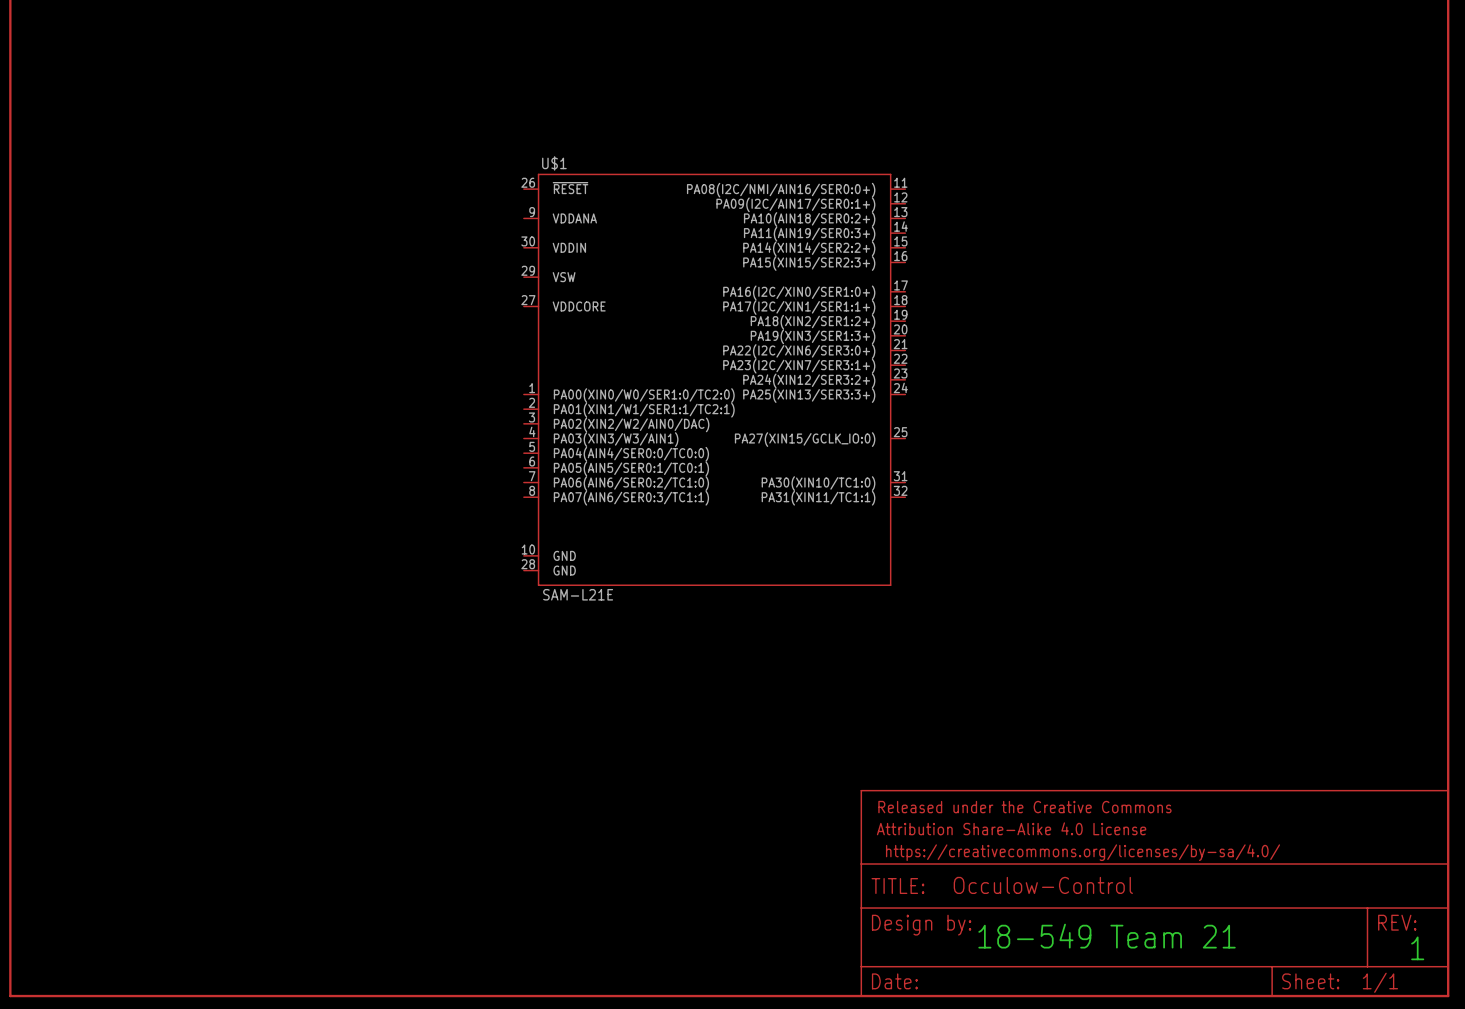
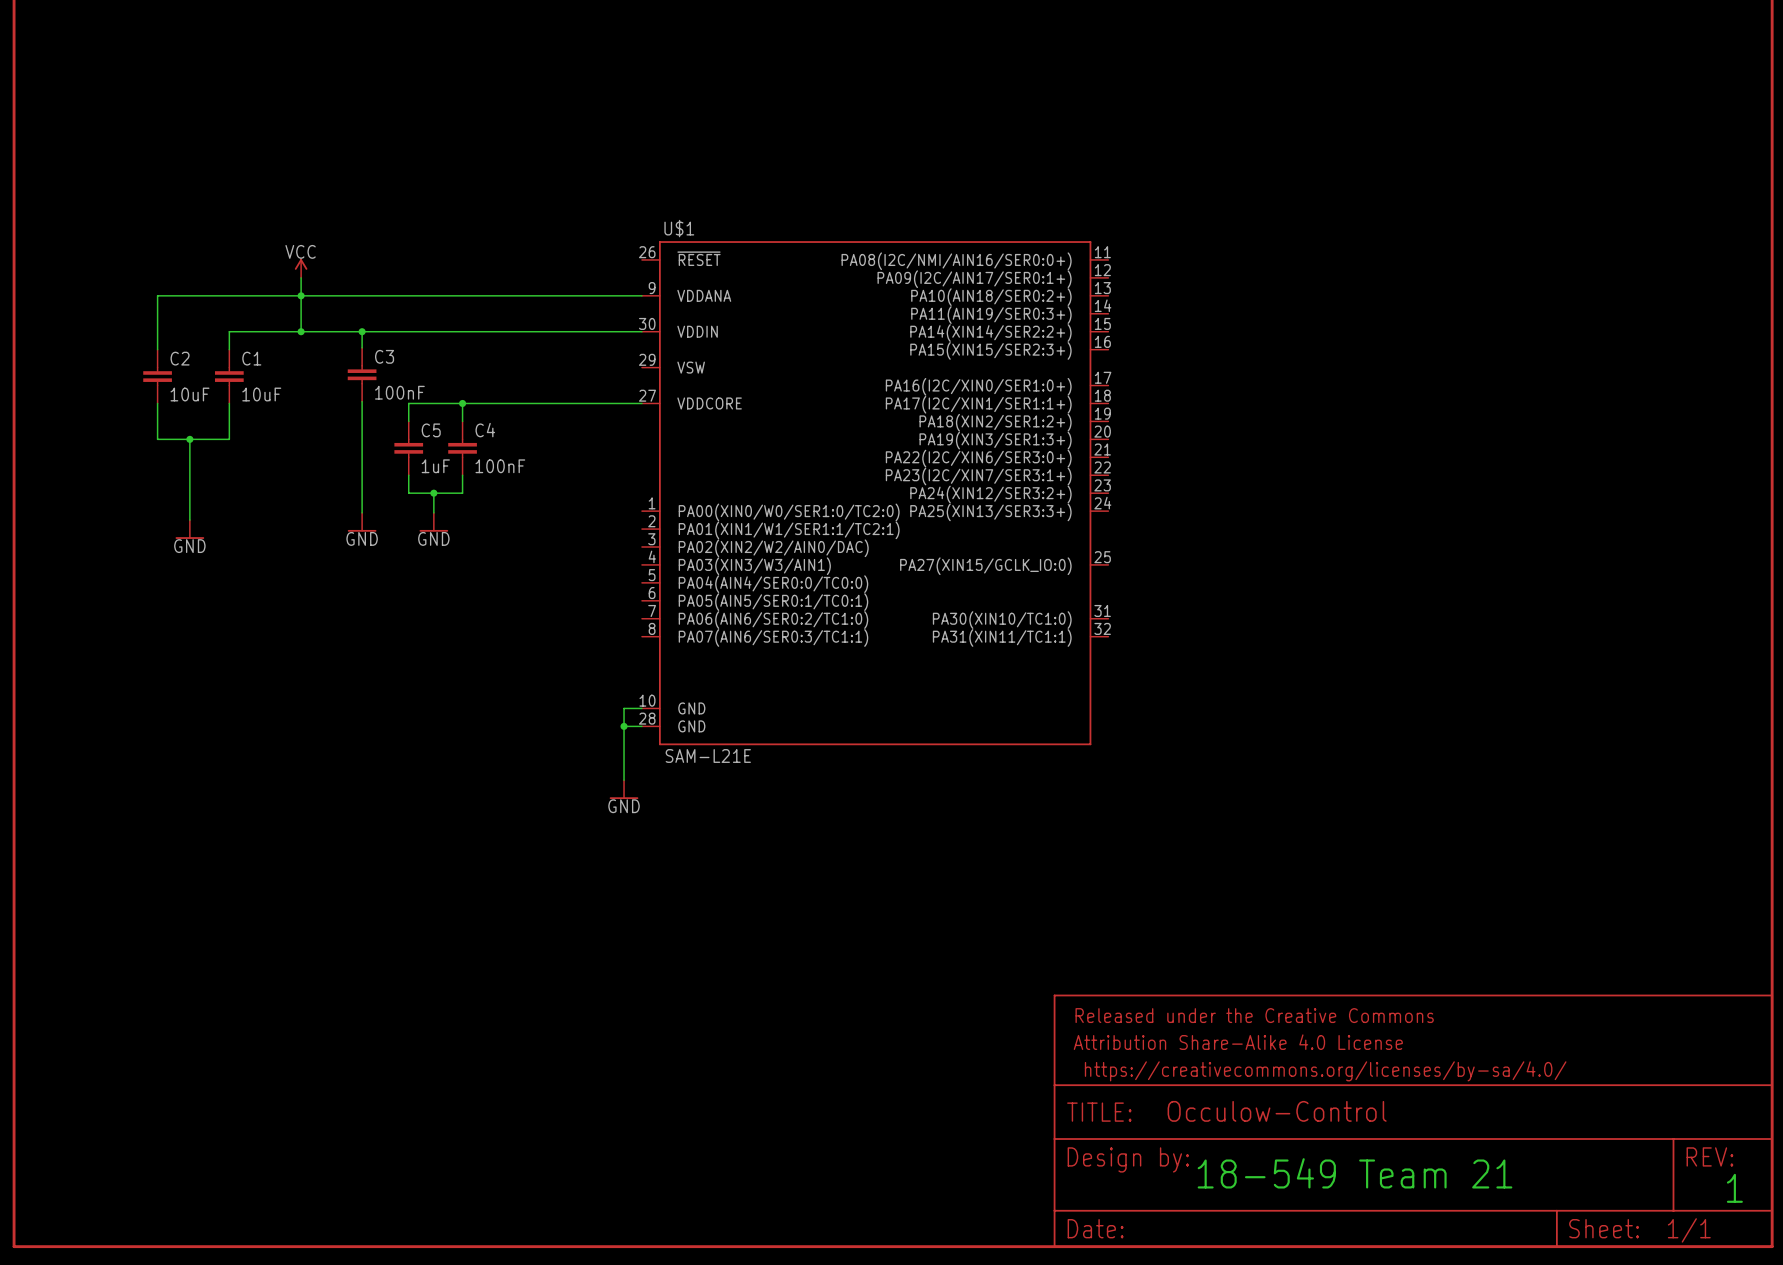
power symbol: none -> VCC (301, 268)
wire: none -> (301, 277) (301, 331)
junction: none -> (301, 295)
wire: none -> (641, 295) (157, 295) (157, 349)
junction: none -> (301, 331)
wire: none -> (362, 331) (362, 347)
junction: none -> (362, 331)
wire: none -> (641, 331) (229, 331) (229, 349)
C3: none -> 100nF (362, 374)
C2: none -> 10uF (157, 376)
C1: none -> 10uF (229, 376)
wire: none -> (362, 401) (362, 512)
wire: none -> (157, 403) (157, 439) (229, 439) (229, 403)
wire: none -> (462, 403) (462, 421)
junction: none -> (462, 403)
wire: none -> (641, 403) (408, 403) (408, 421)
wire: none -> (189, 439) (189, 520)
junction: none -> (189, 439)
C5: none -> 1uF (408, 448)
C4: none -> 100nF (462, 448)
wire: none -> (408, 475) (408, 493) (462, 493) (462, 475)
wire: none -> (433, 493) (433, 512)
junction: none -> (433, 493)
power symbol: none -> GND (362, 522)
power symbol: none -> GND (433, 522)
power symbol: none -> GND (189, 529)
wire: none -> (641, 708) (624, 708) (624, 780)
wire: none -> (624, 726) (641, 726)
junction: none -> (624, 726)
power symbol: none -> GND (624, 789)

